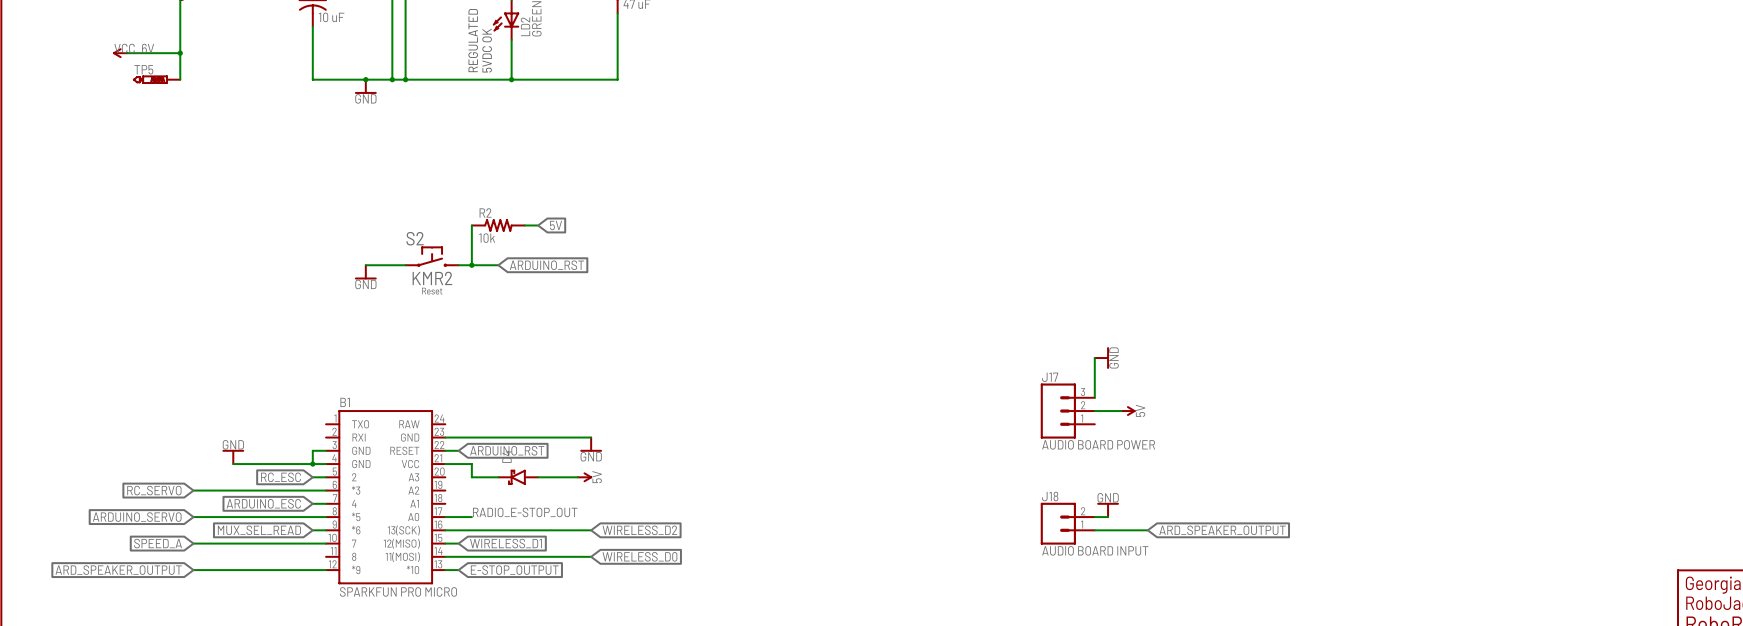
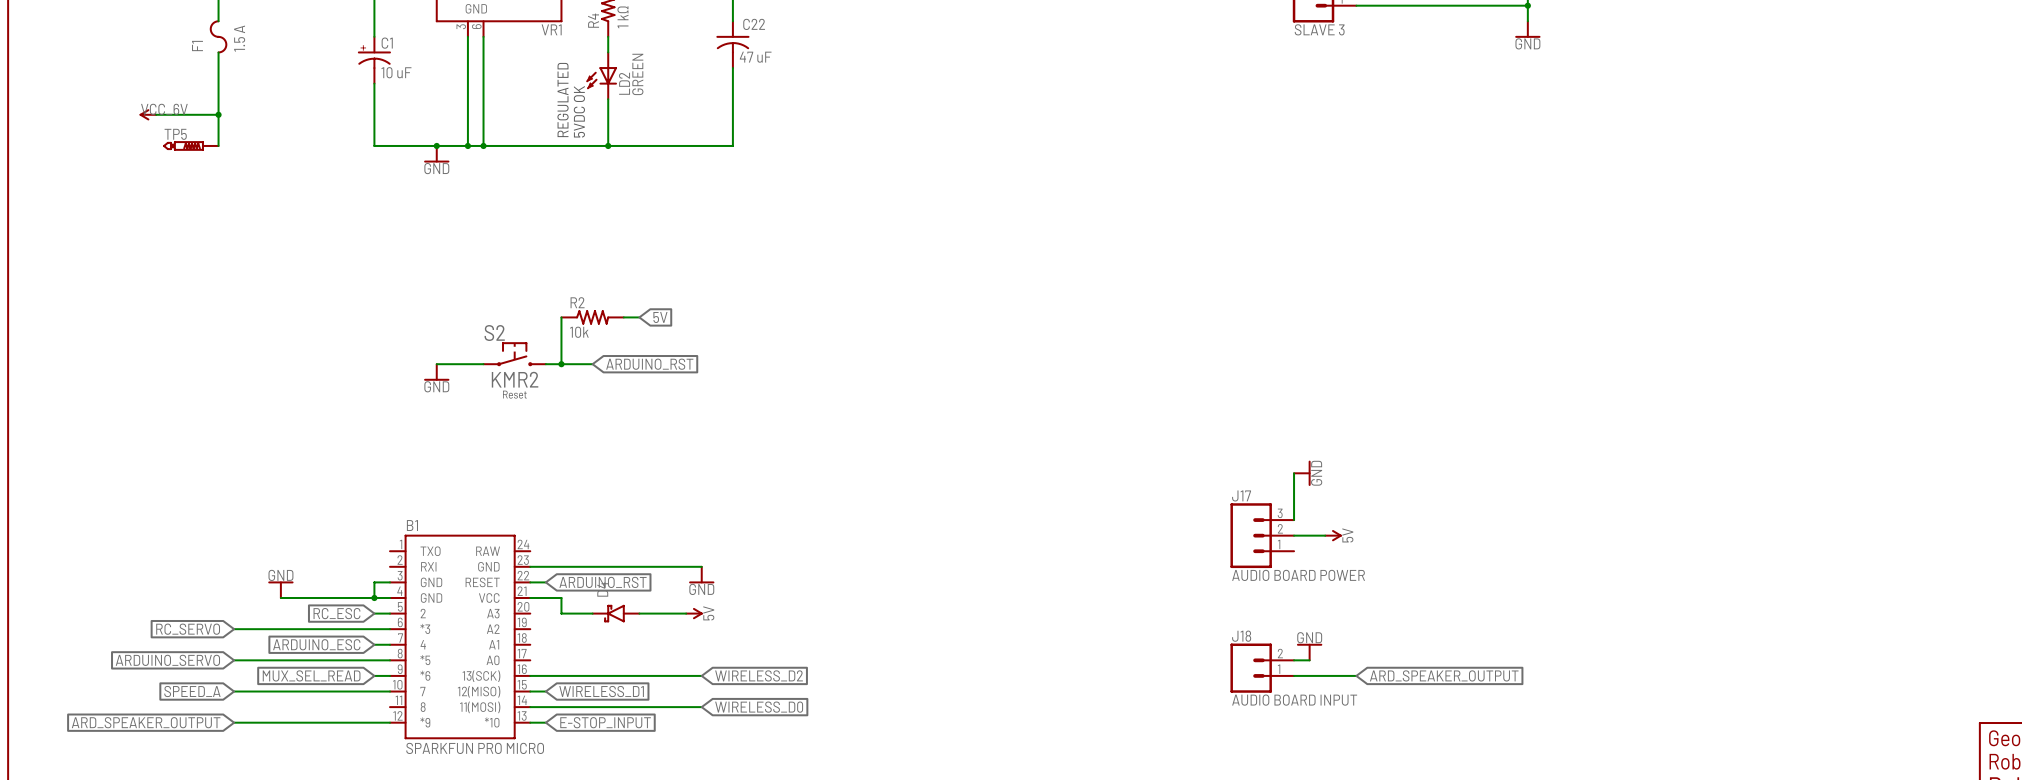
label: RADIO_E-STOP_OUT (525, 512) -> none
wire: (445, 517) (471, 517) -> none
global label: E-STOP_OUTPUT (514, 570) -> E-STOP_INPUT (605, 722)

